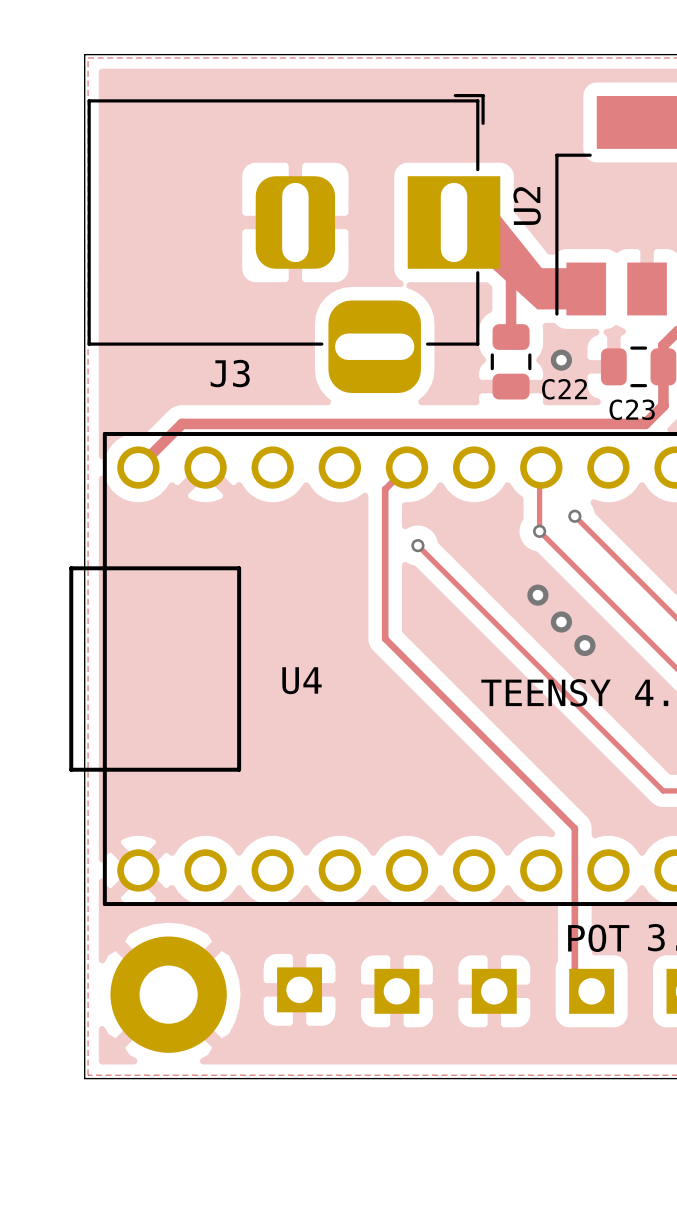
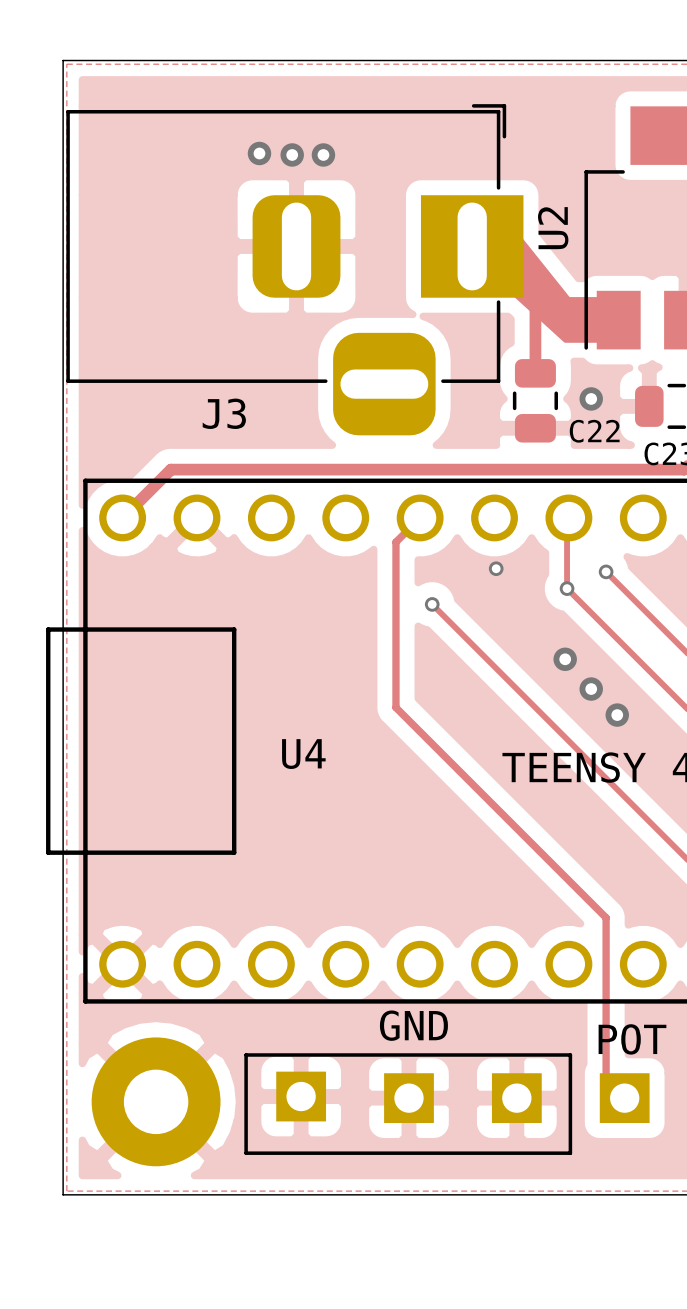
via: none -> (259, 153)
via: none -> (292, 154)
via: none -> (323, 154)
via: none -> (496, 568)
text: none -> GND (413, 1025)
line: none -> (246, 1054) (570, 1054) (570, 1153) (246, 1153) (246, 1054)

